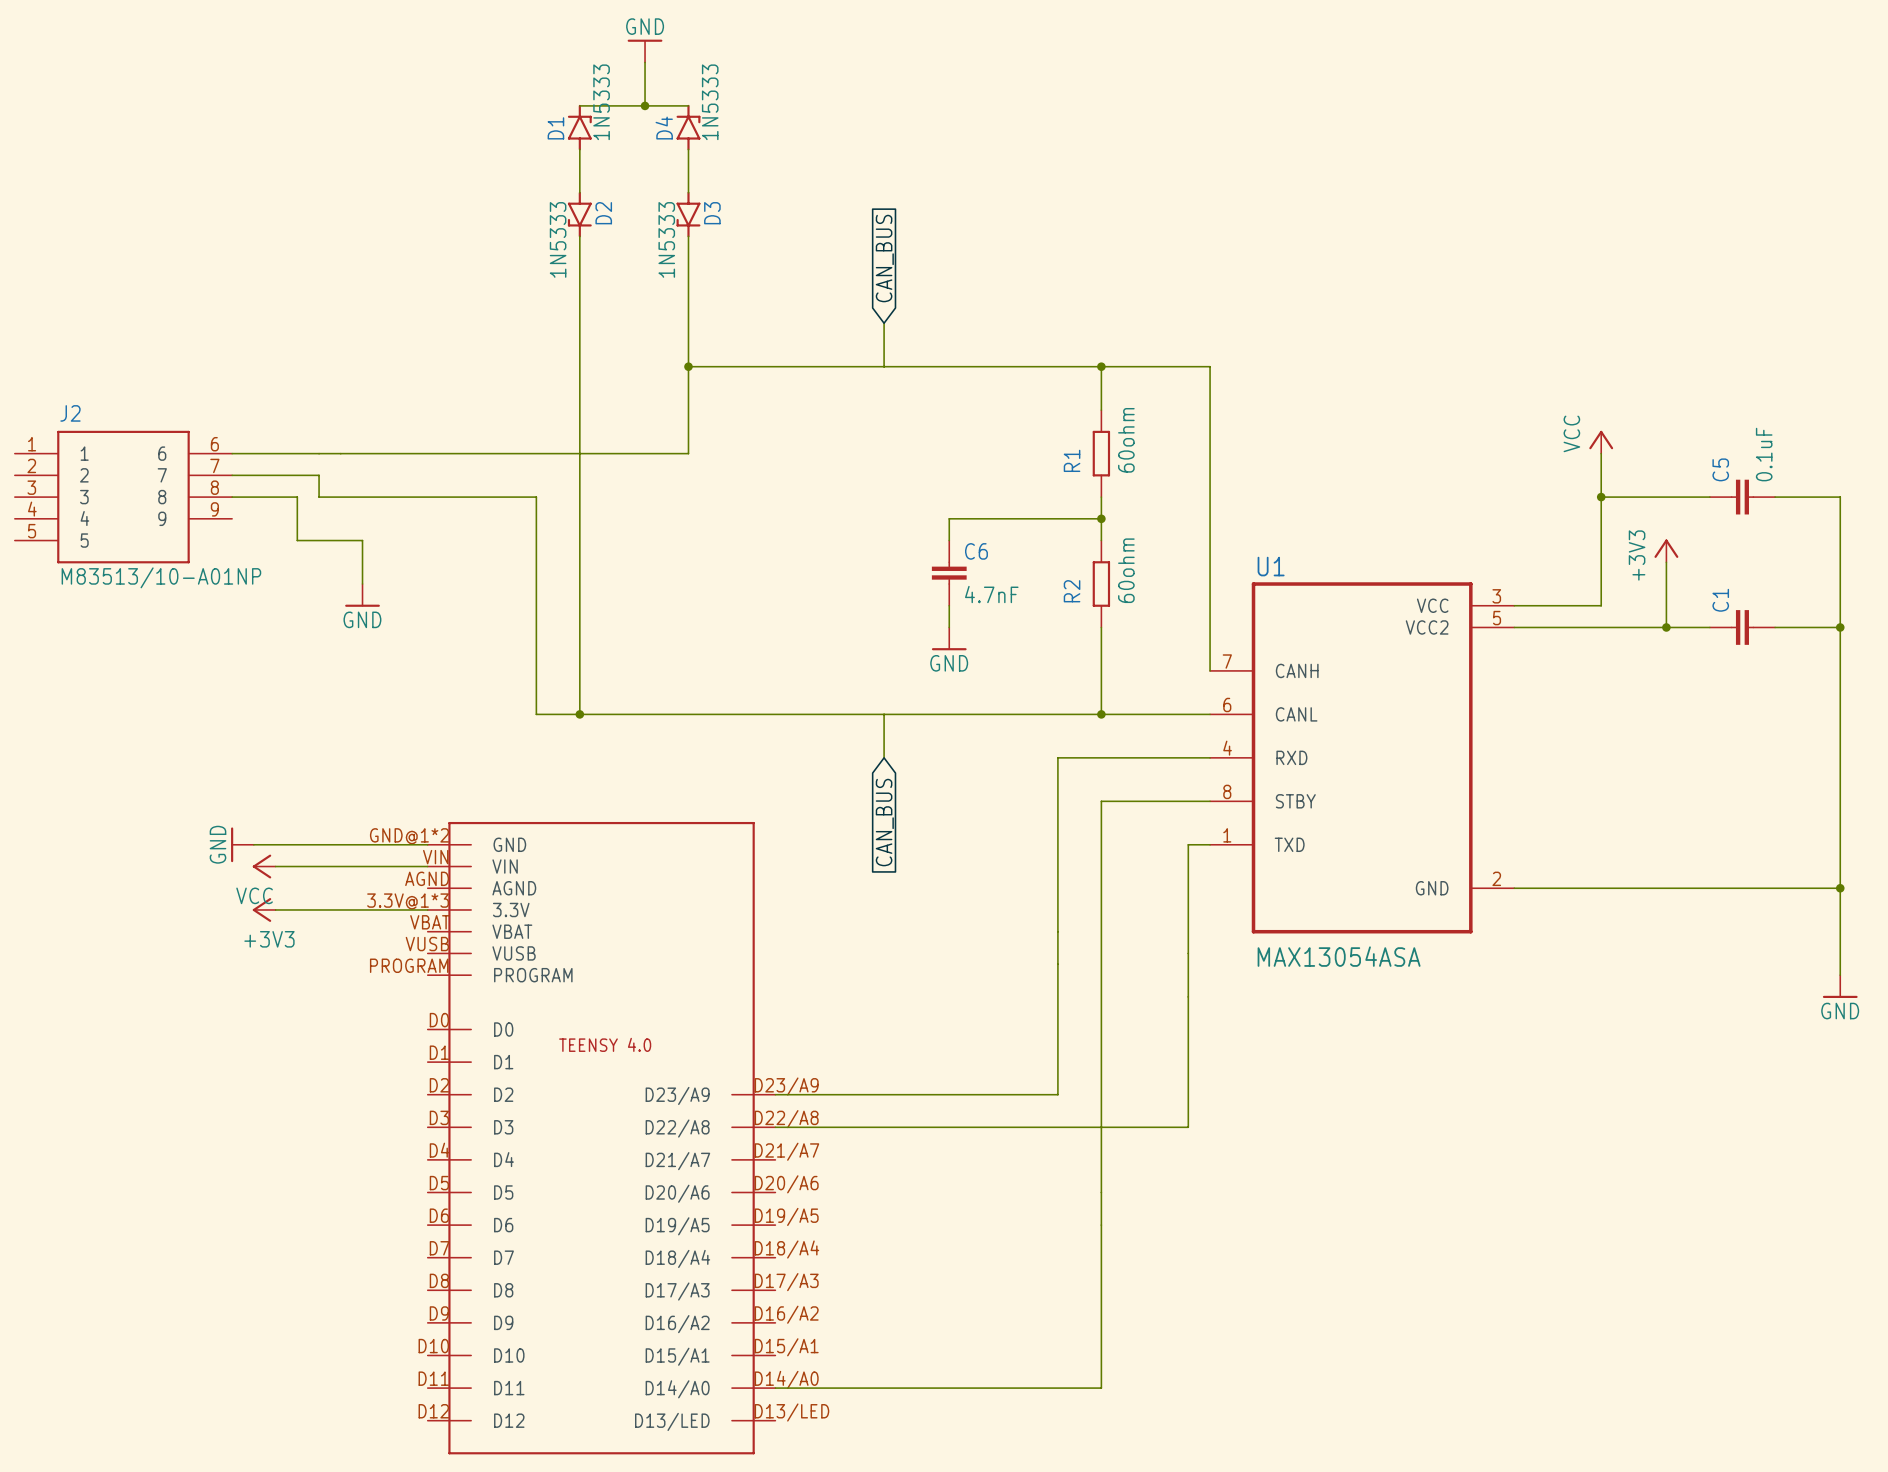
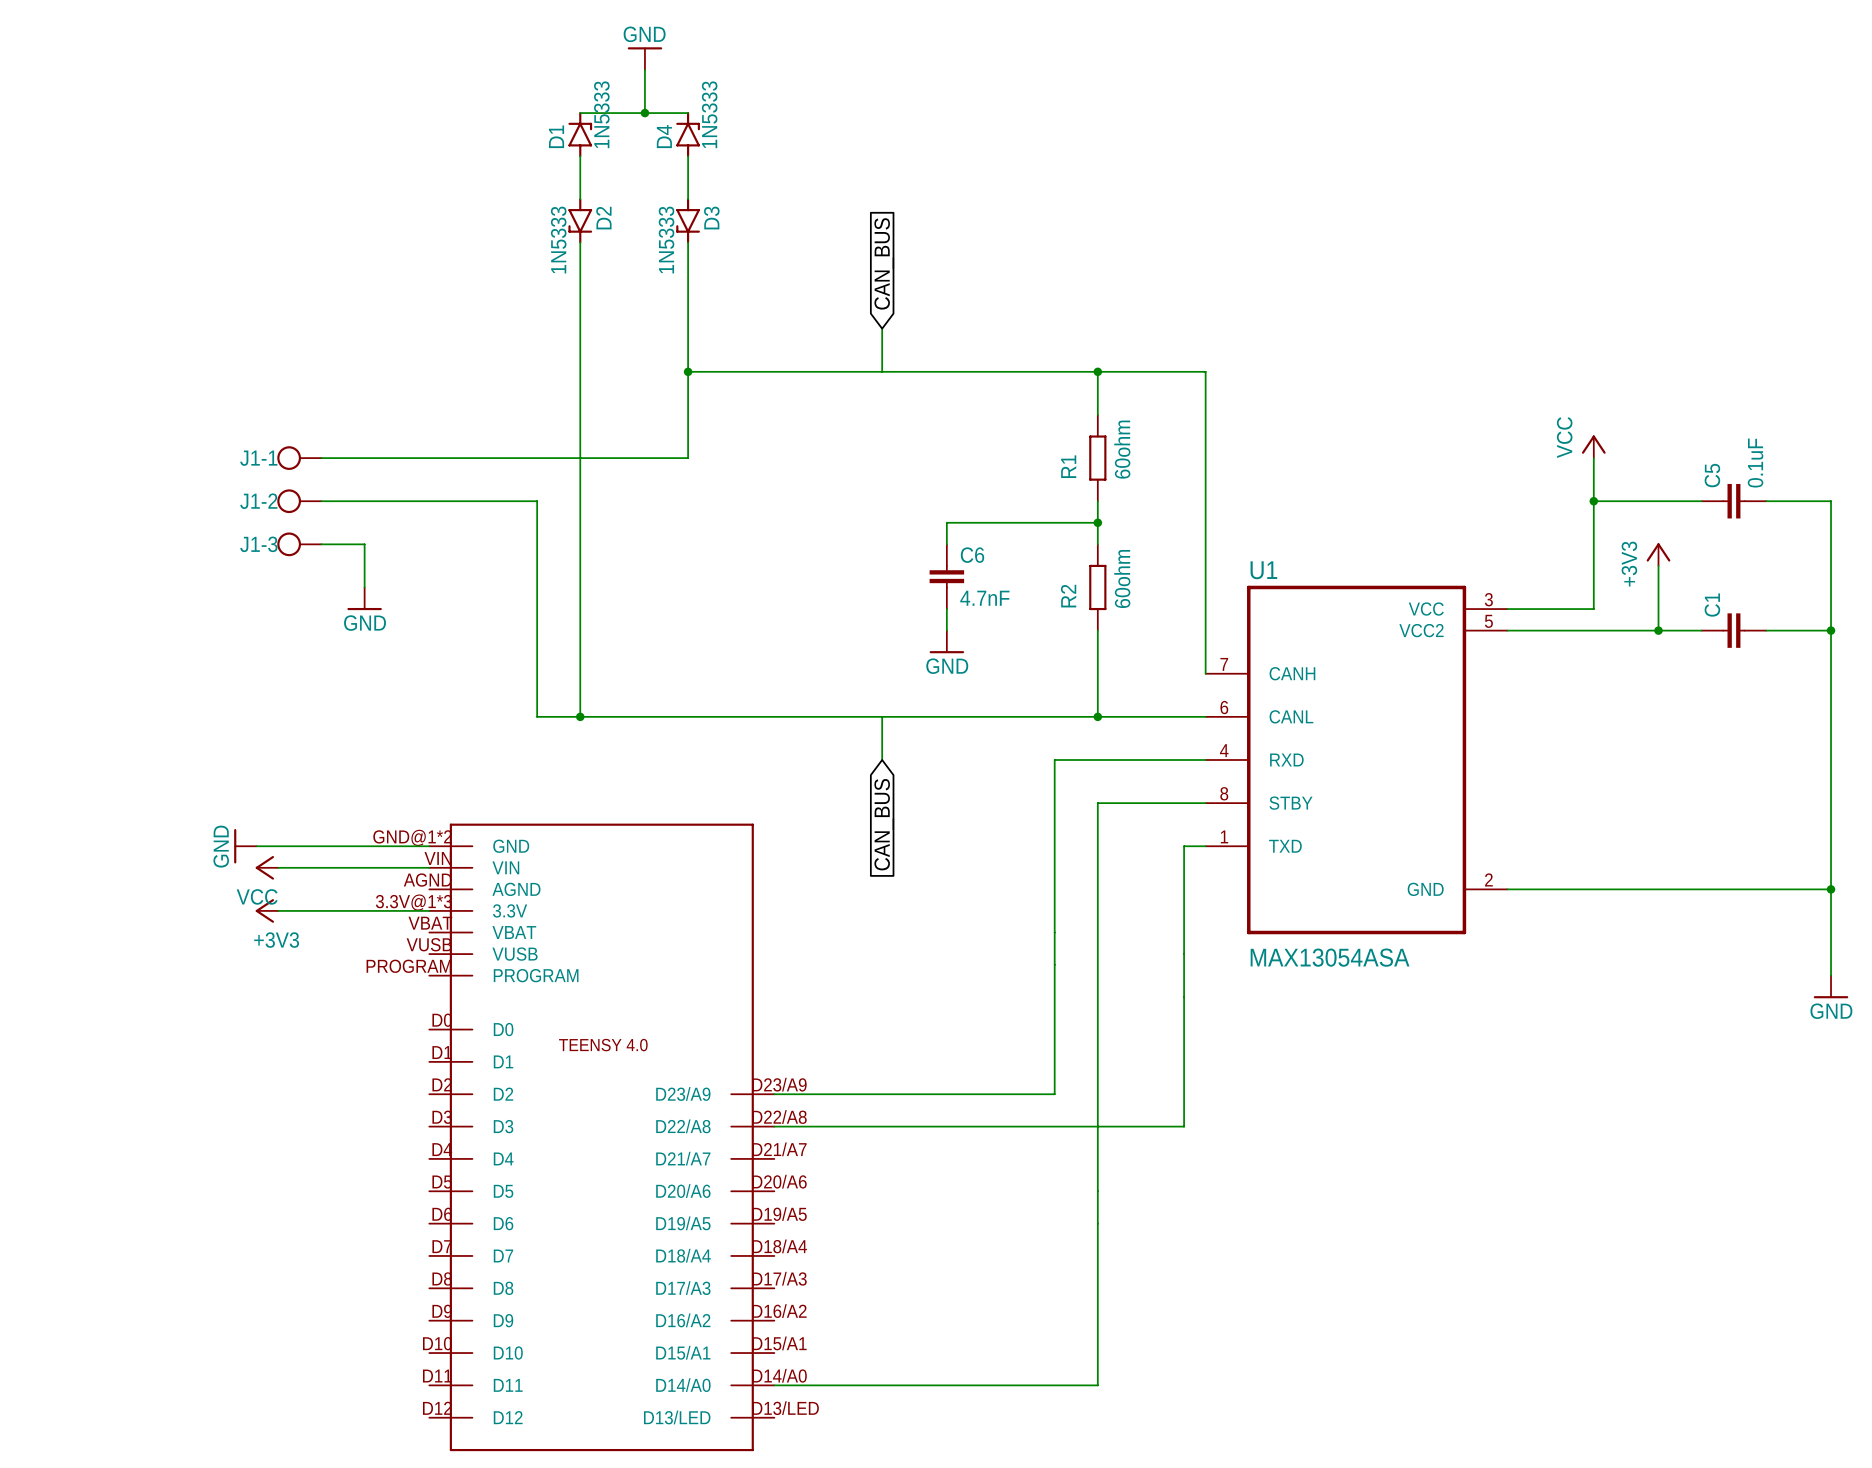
wire: (232, 453) (319, 453) -> none
J1-1: none -> (299, 458)
wire: (232, 475) (319, 475) (319, 497) -> none
J2: M83513/10-A01NP (123, 497) -> none
wire: (232, 497) (297, 497) (297, 540) (319, 540) -> none
J1-2: none -> (299, 501)
J1-3: none -> (299, 544)

